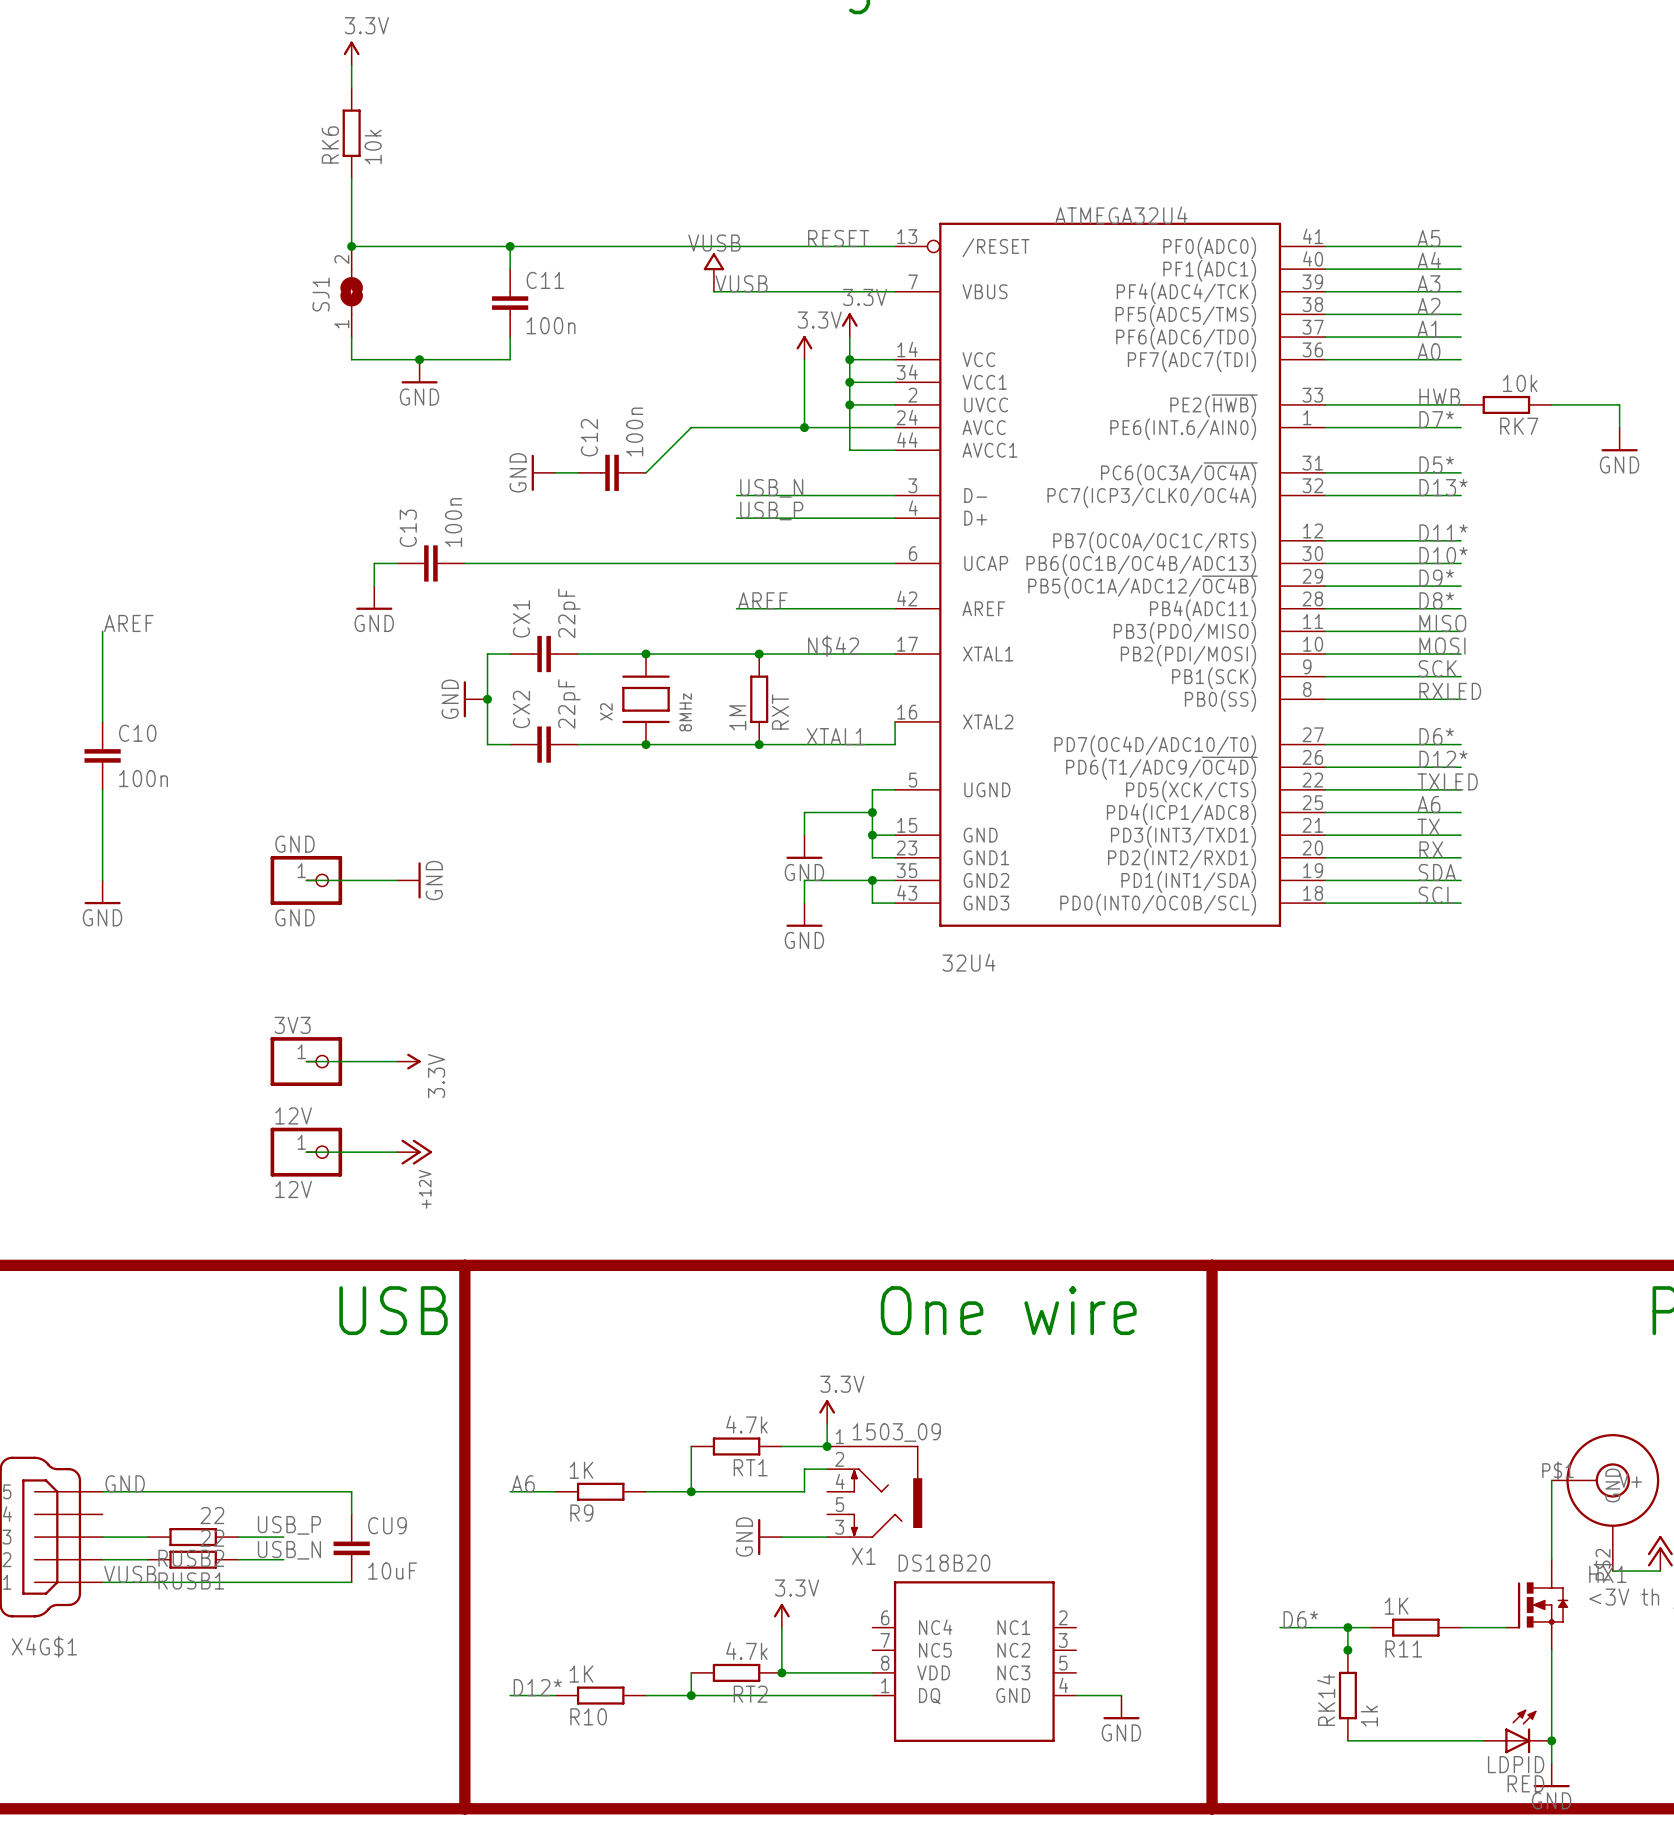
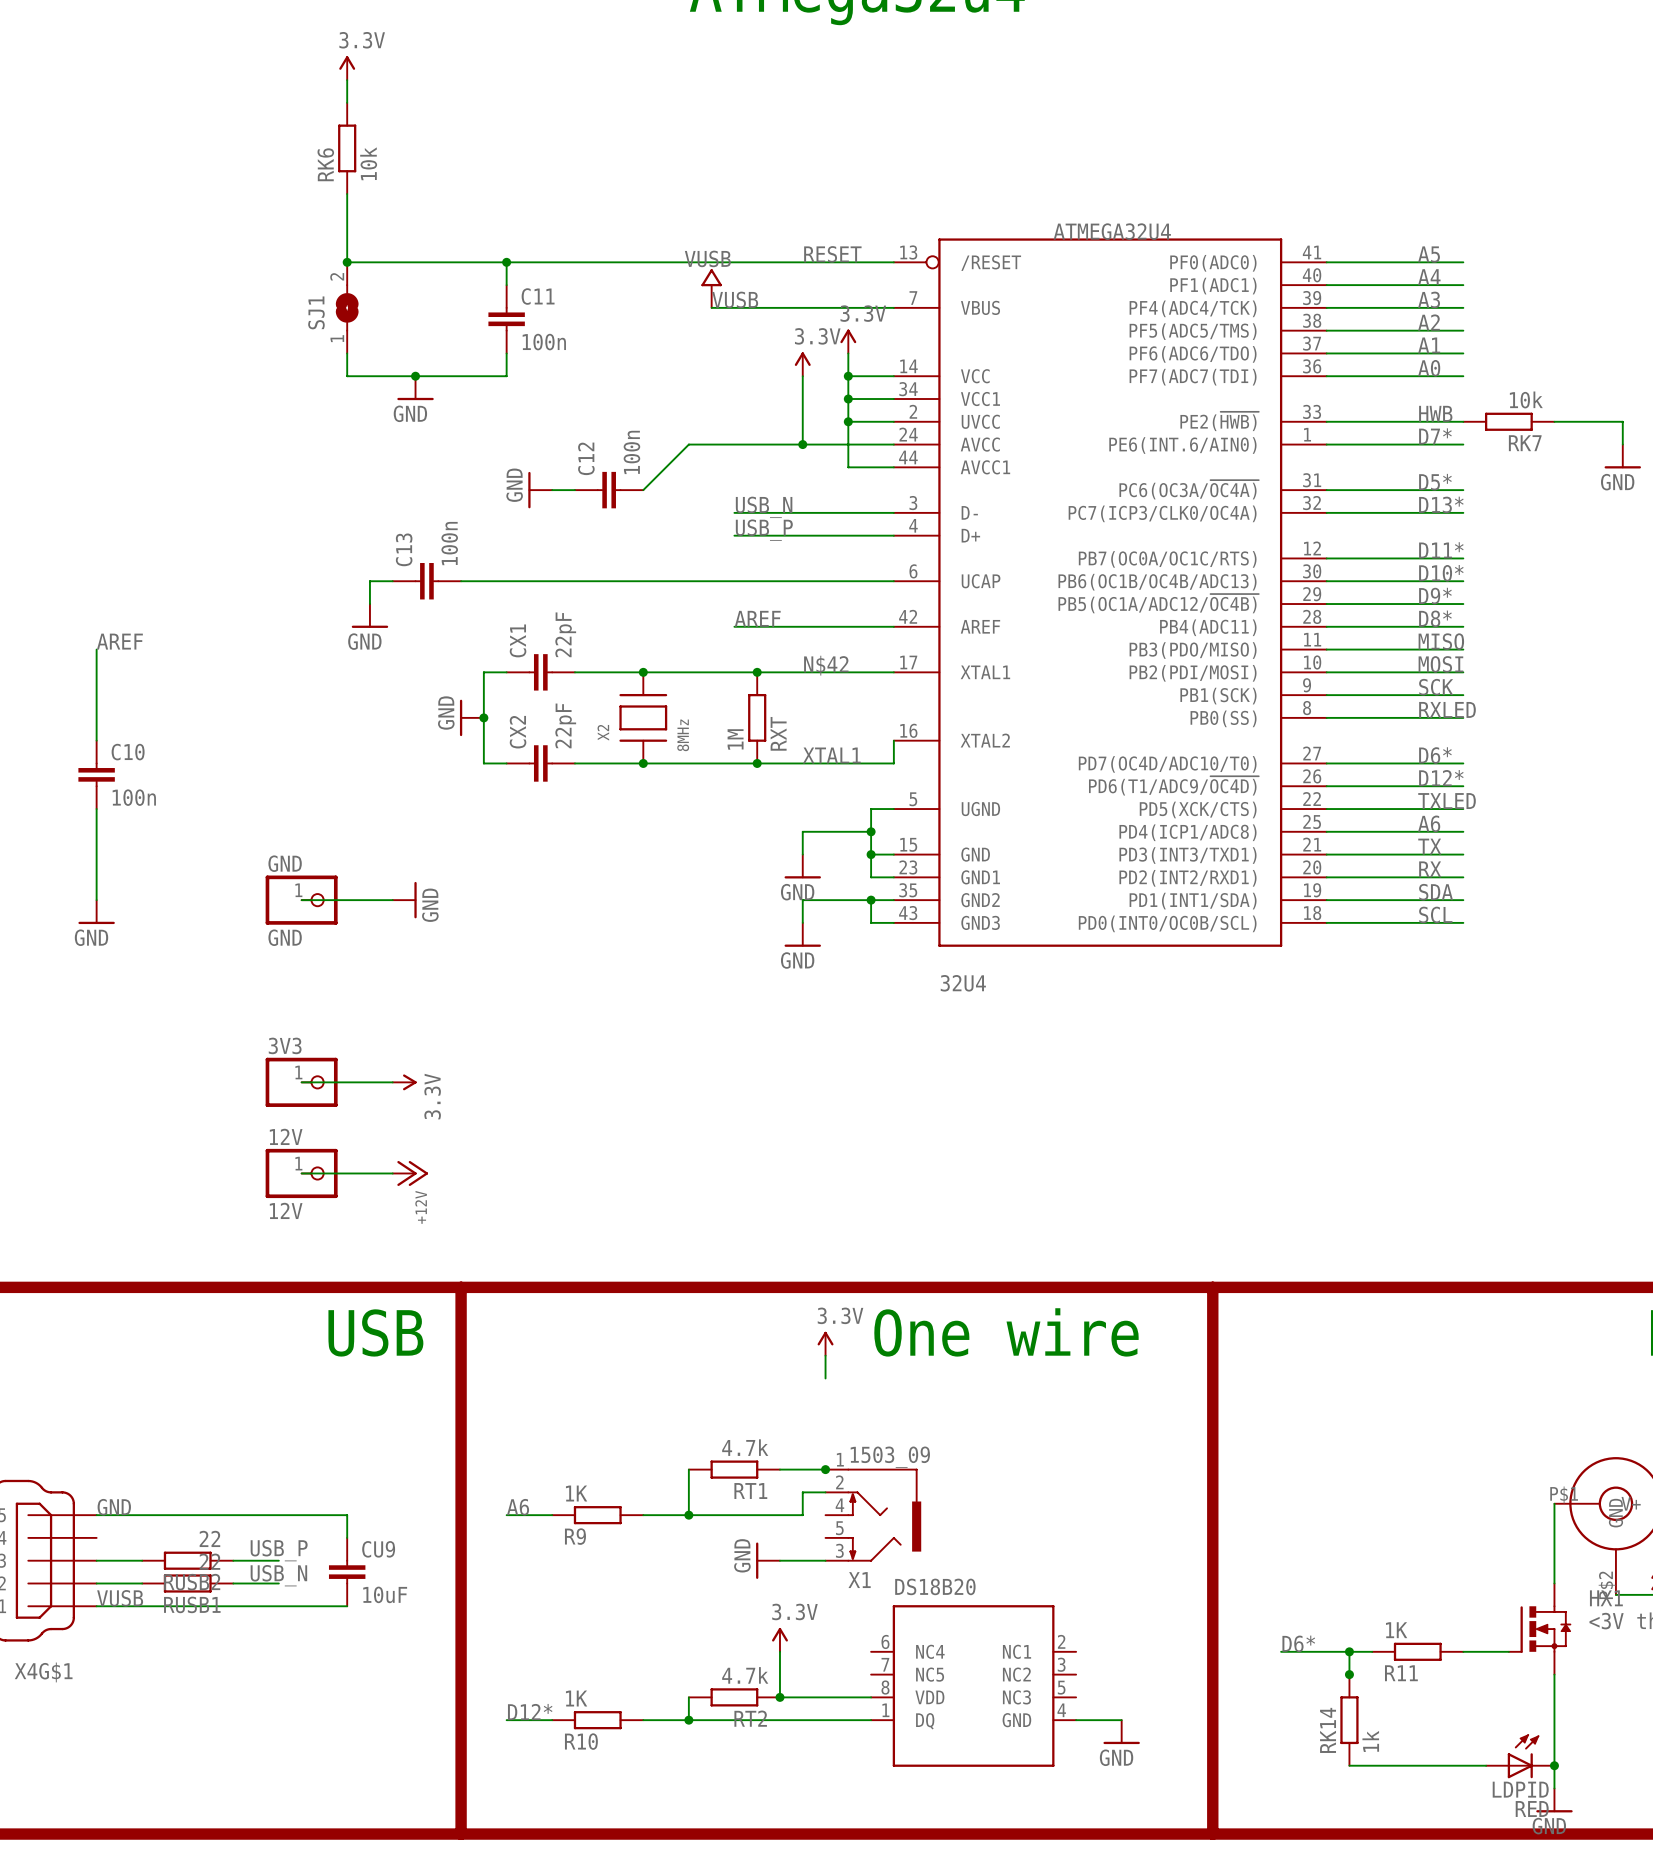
power symbol position: 3.3V (827, 1411) -> 3.3V (825, 1343)
wire: (827, 1423) (827, 1446) -> (825, 1355) (825, 1378)

